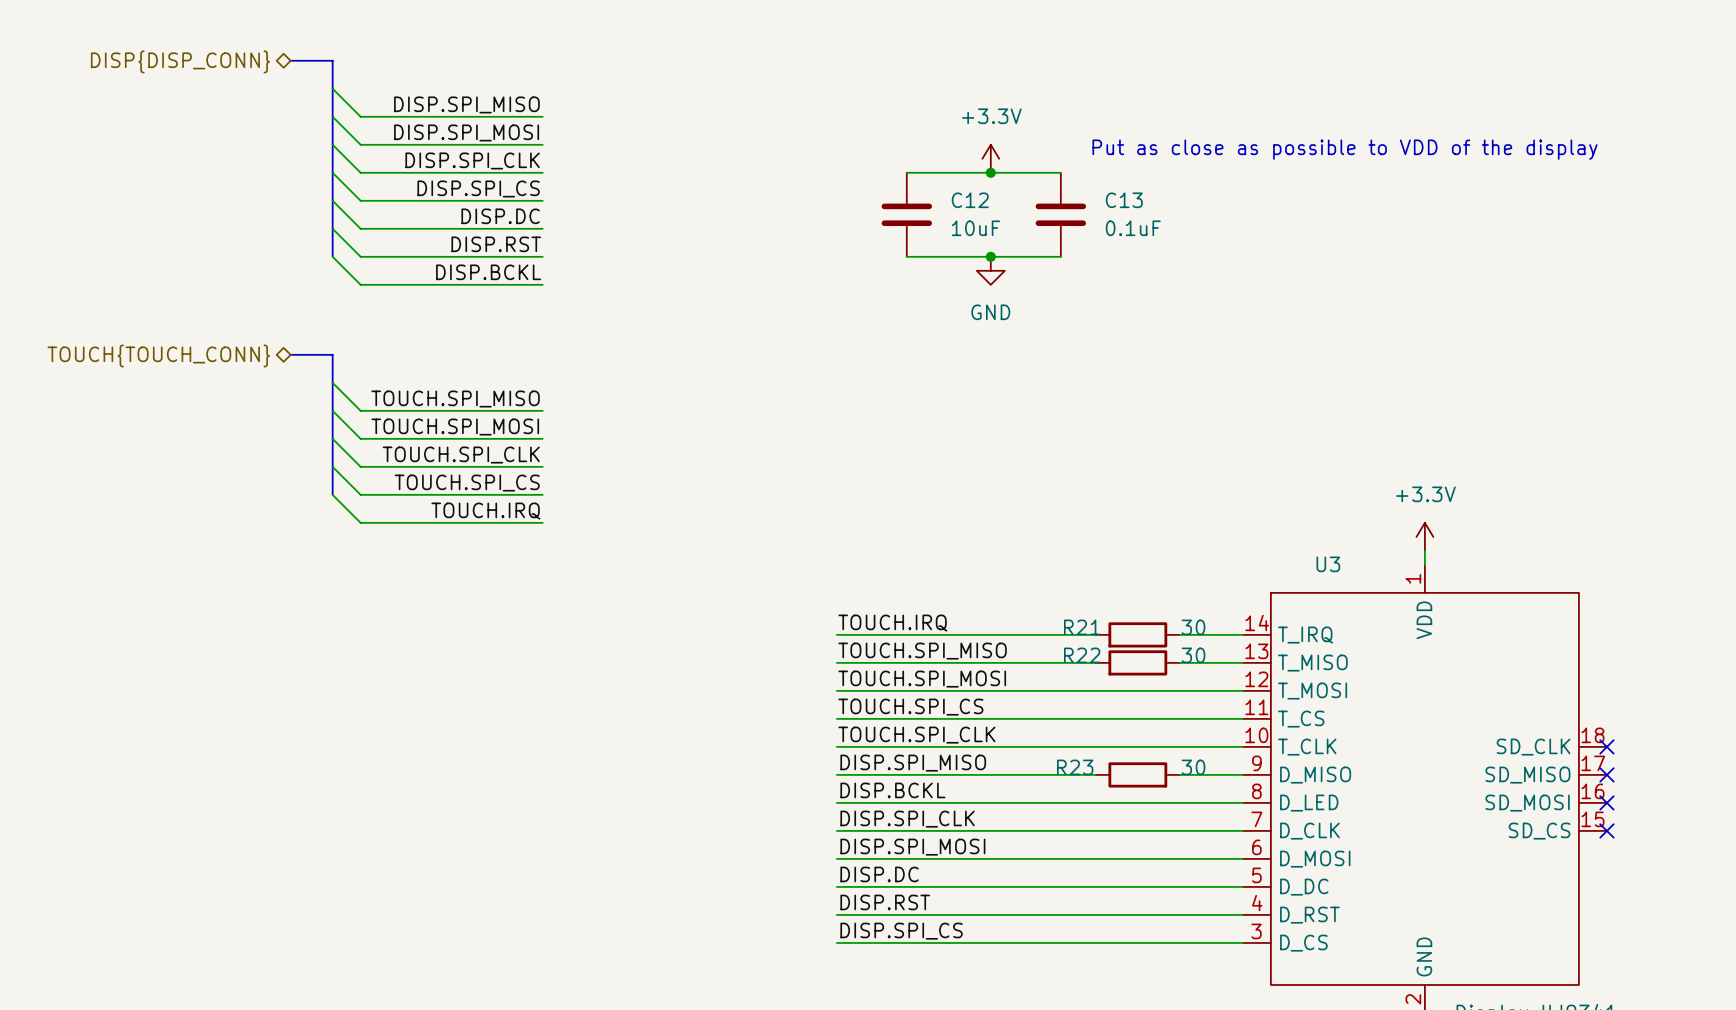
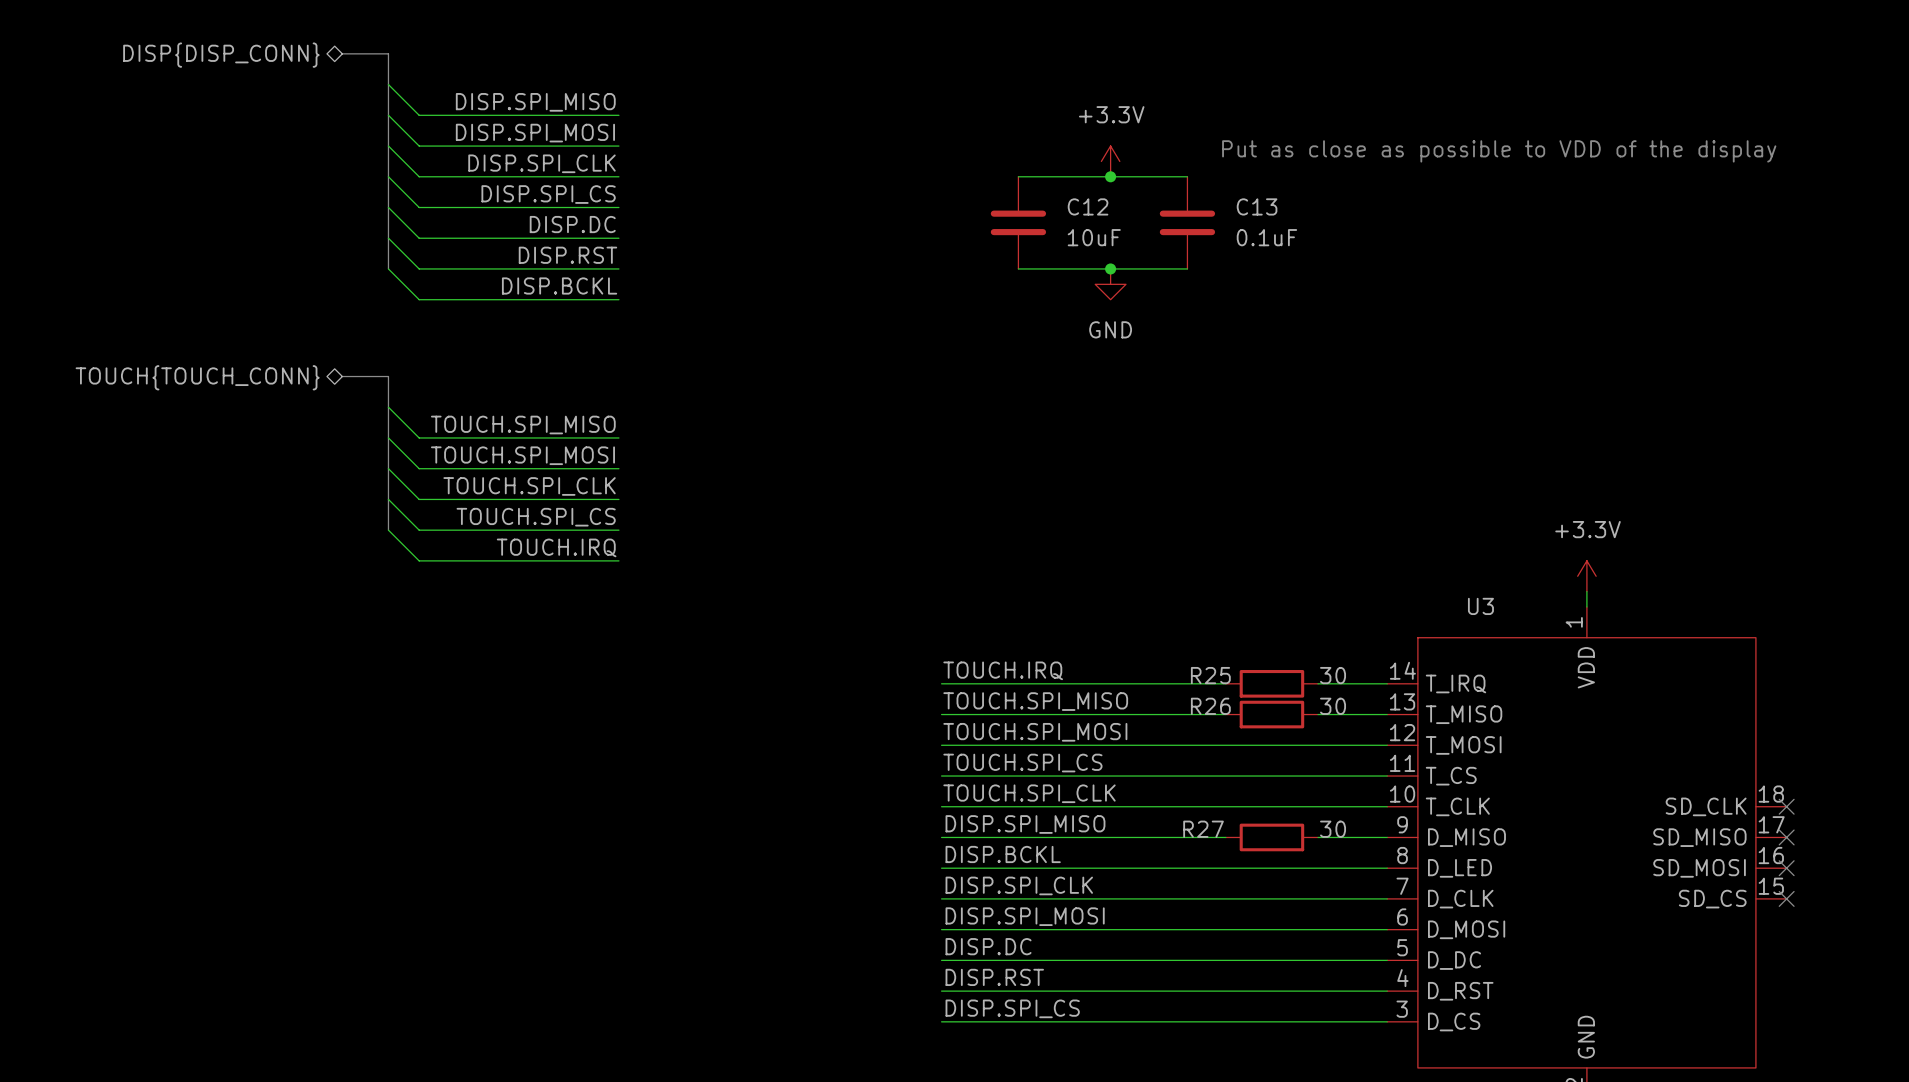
R21 name: R21 (1082, 627) -> R25 (1210, 675)
R22 name: R22 (1082, 655) -> R26 (1210, 706)
R23 name: R23 (1075, 767) -> R27 (1203, 829)

